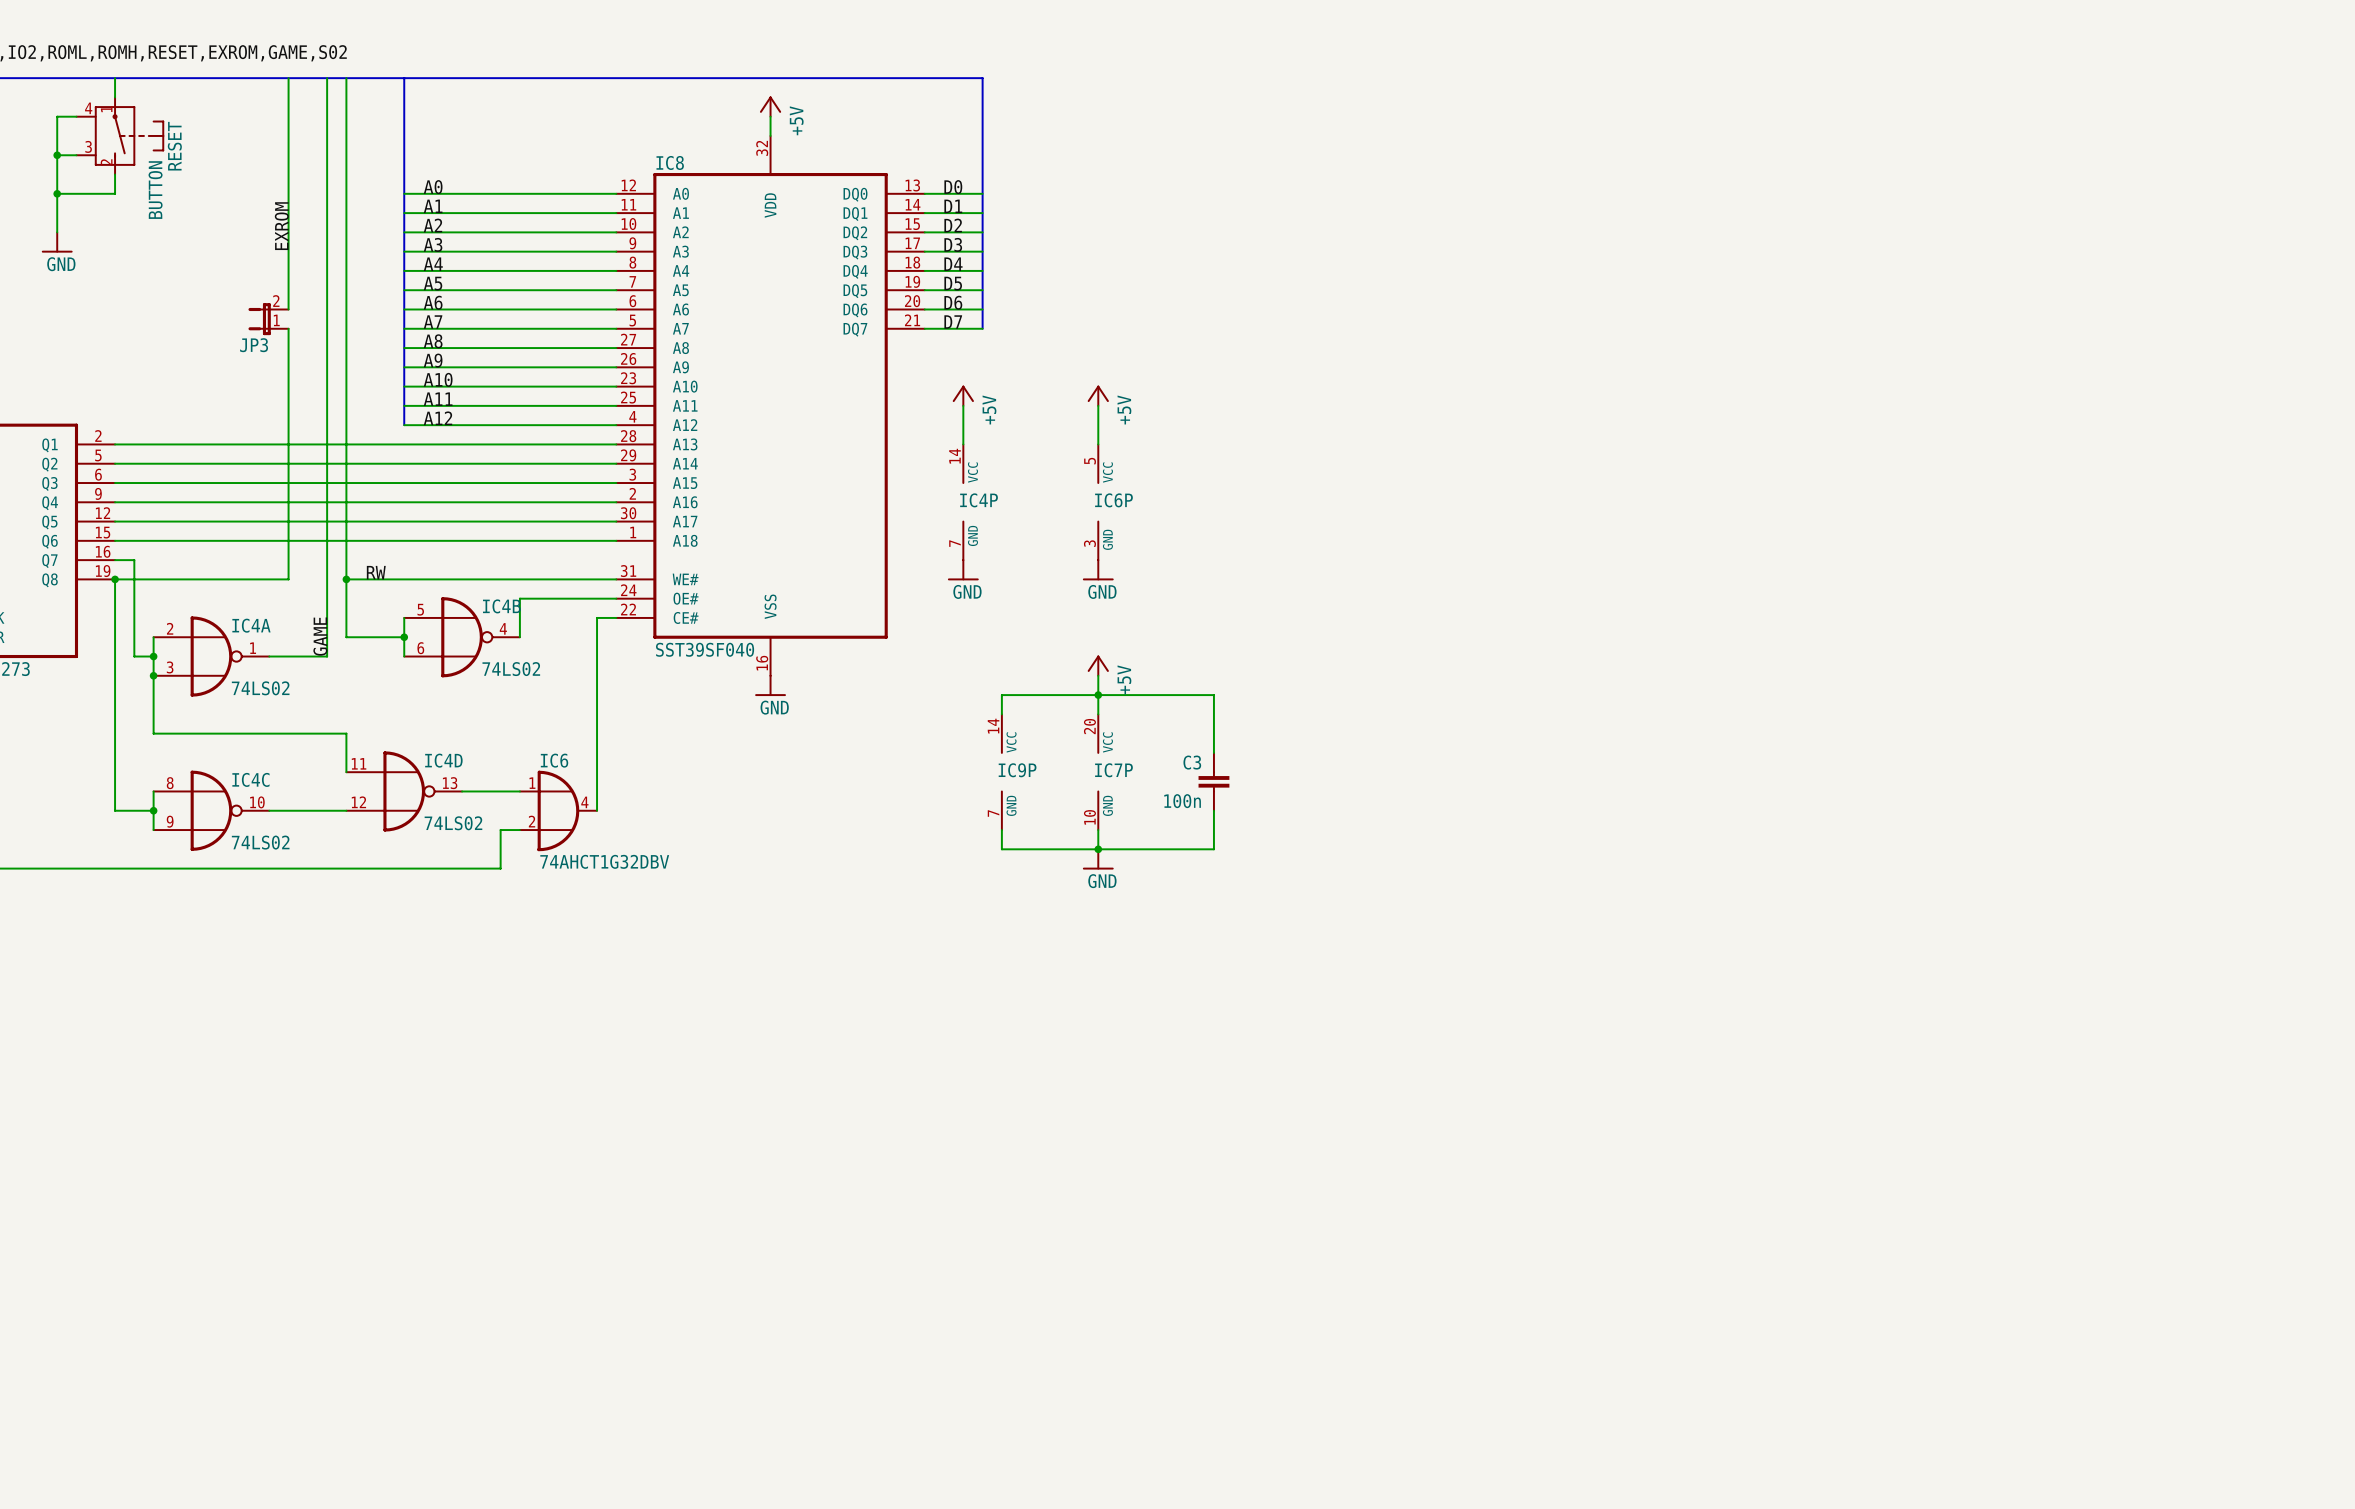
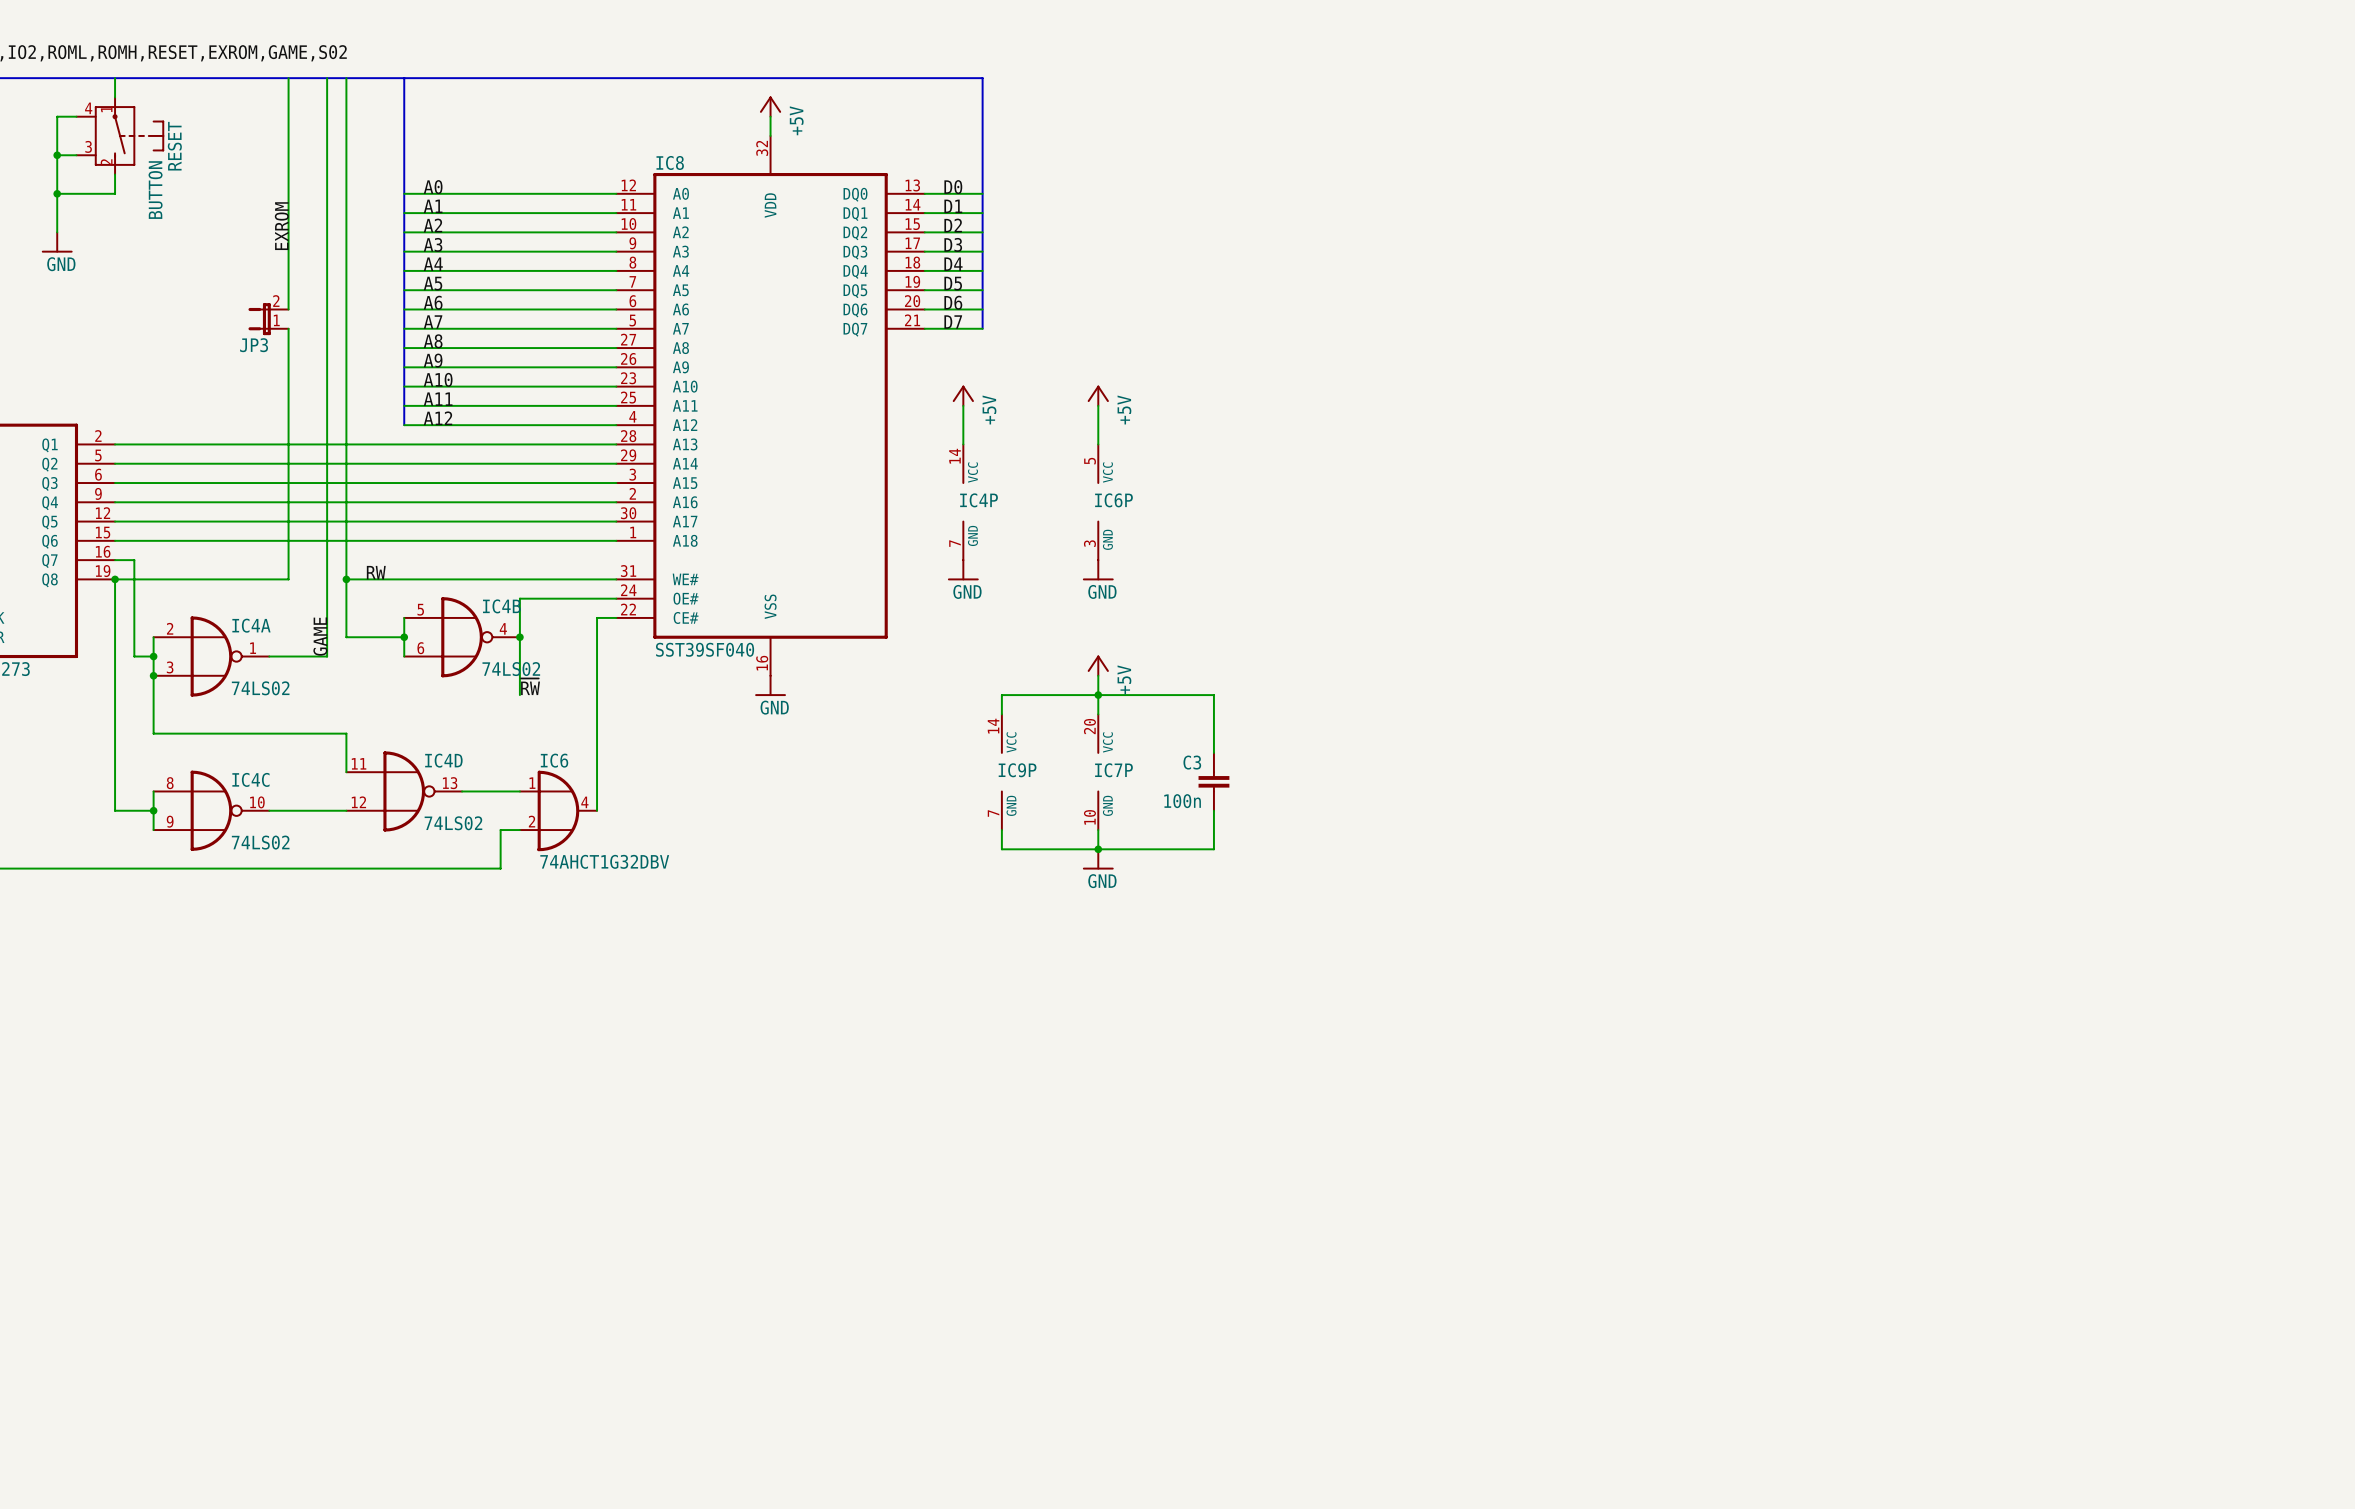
wire: none -> (519, 637) (519, 695)
junction: none -> (519, 637)
label: none -> ~{RW} (530, 686)

